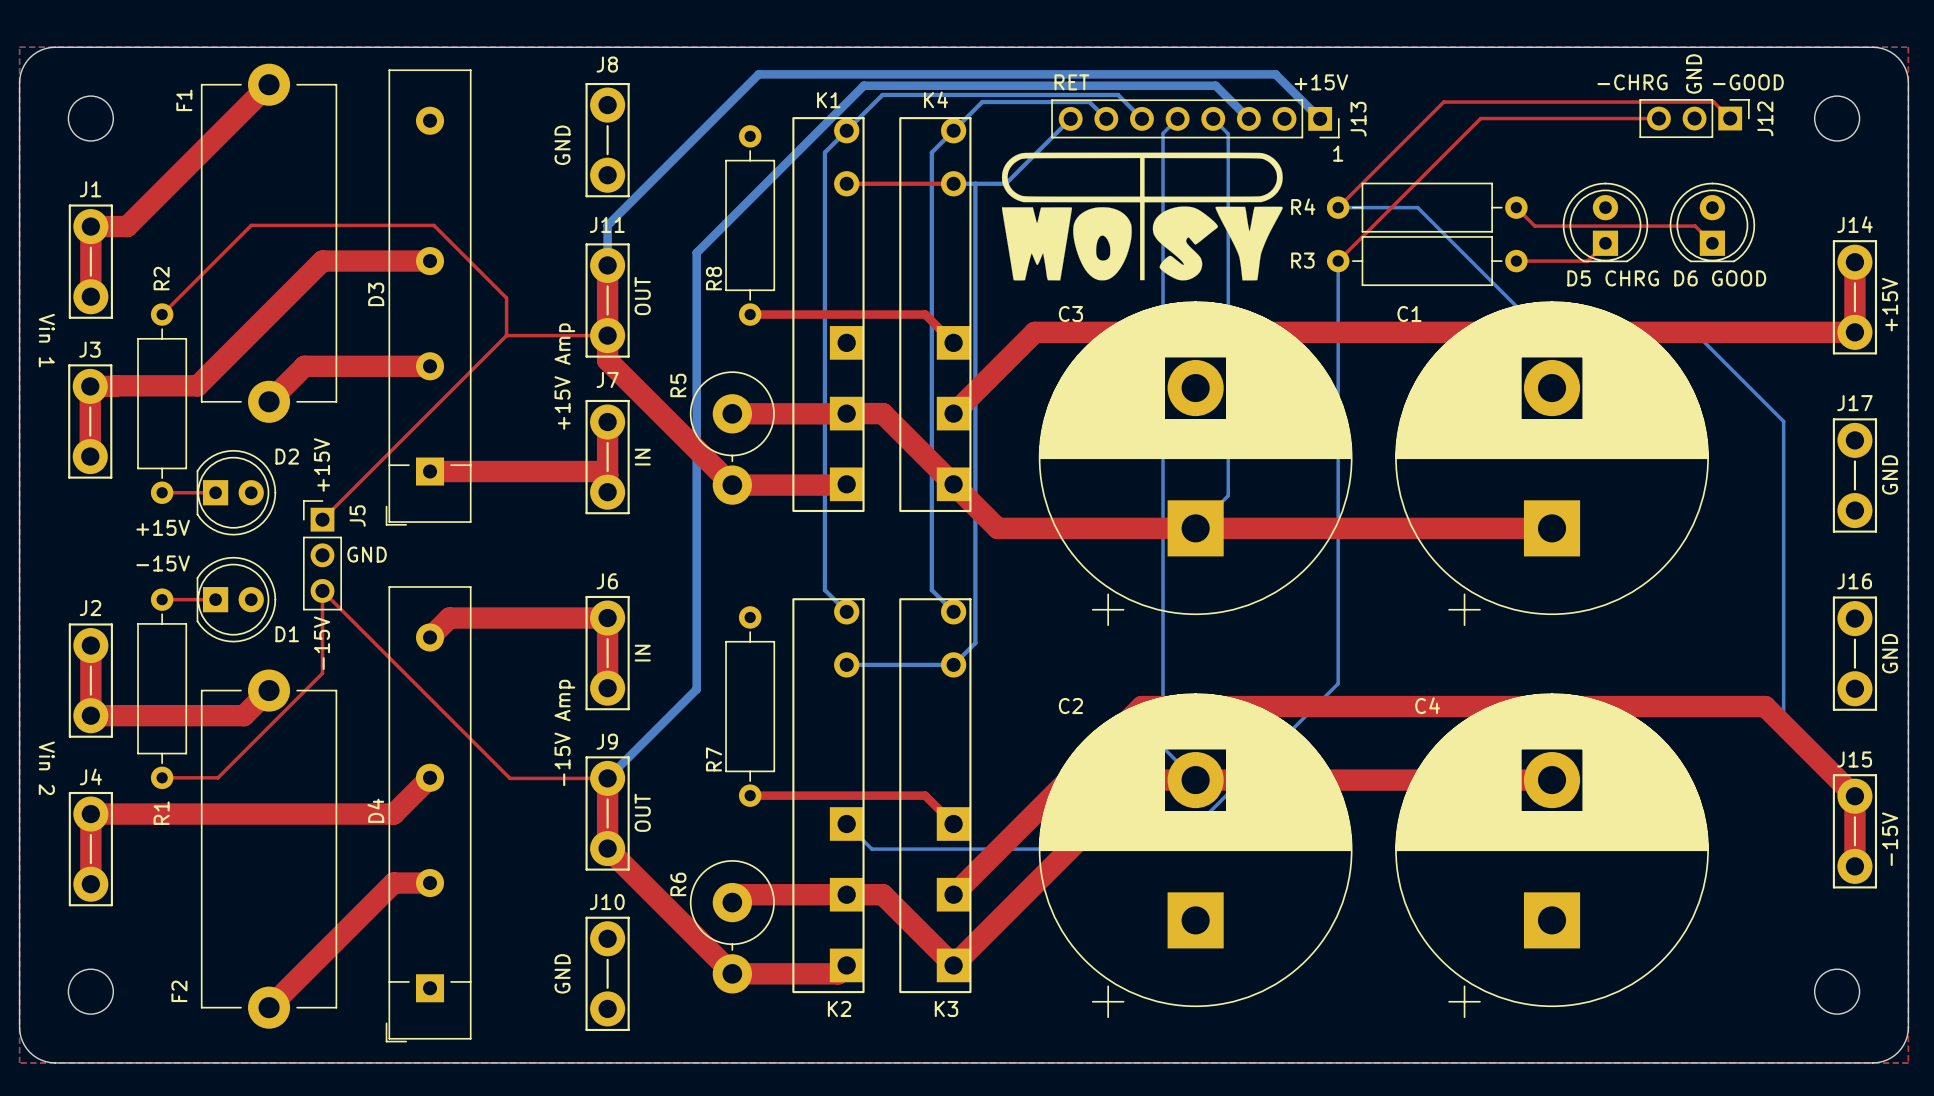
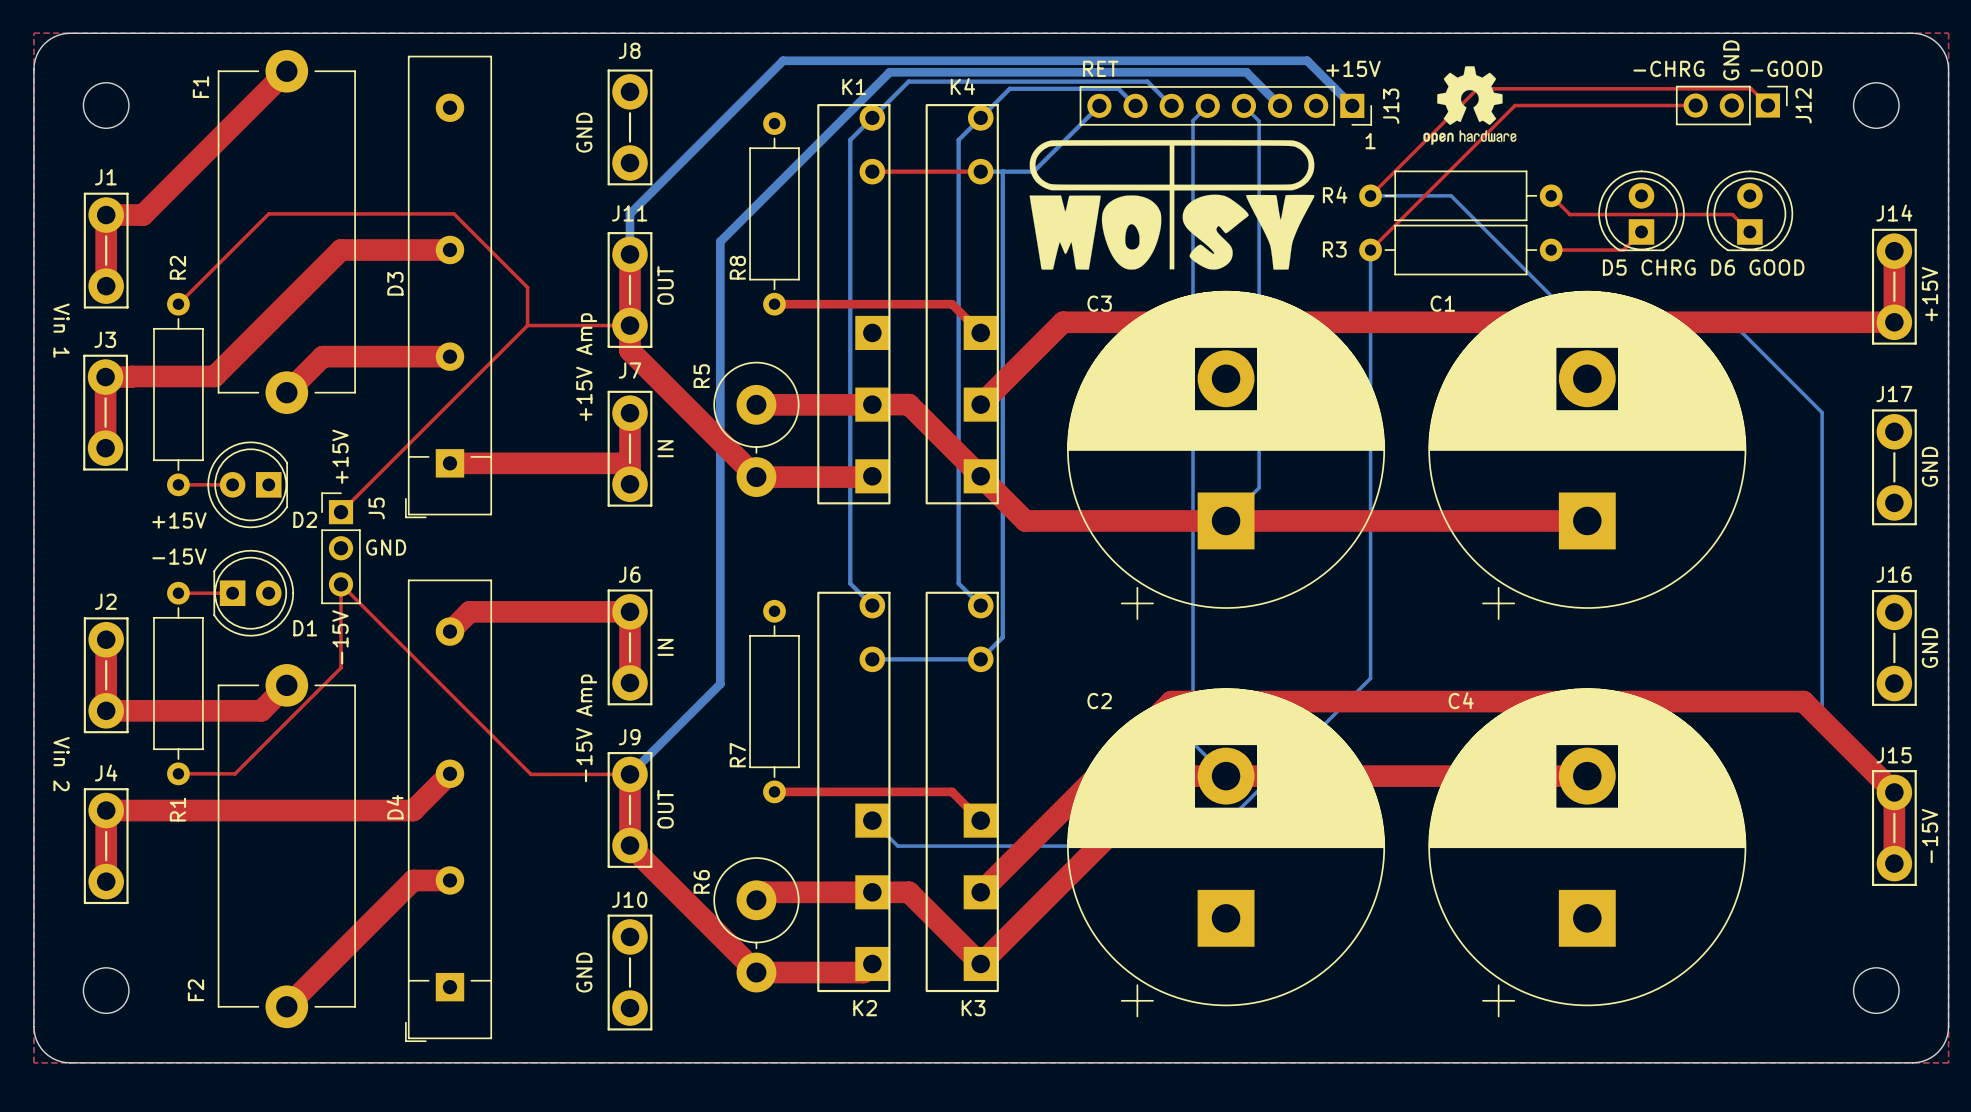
drawing: none -> [1423, 66, 1517, 146]
D2 name position: D2 (287, 456) -> D2 (305, 519)
D2 rotation: 0° (236, 492) -> 180° (247, 484)

